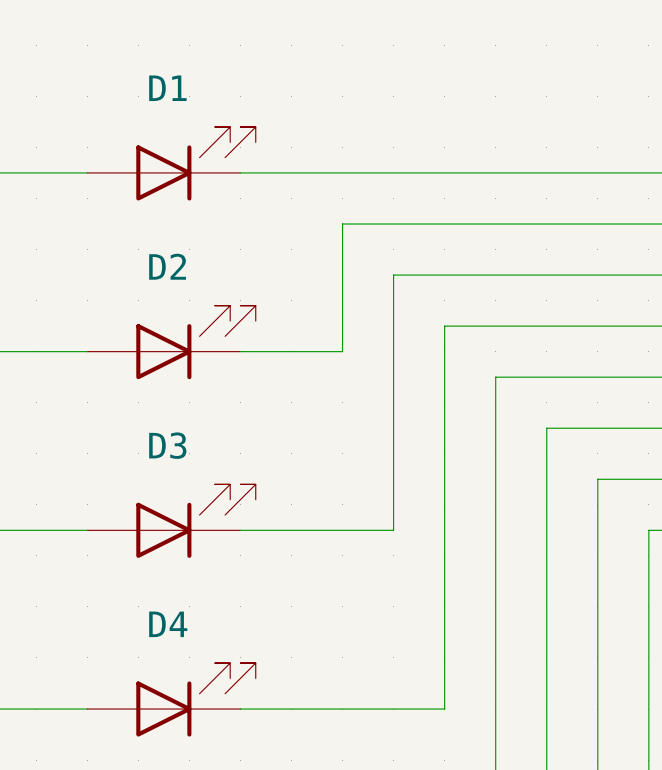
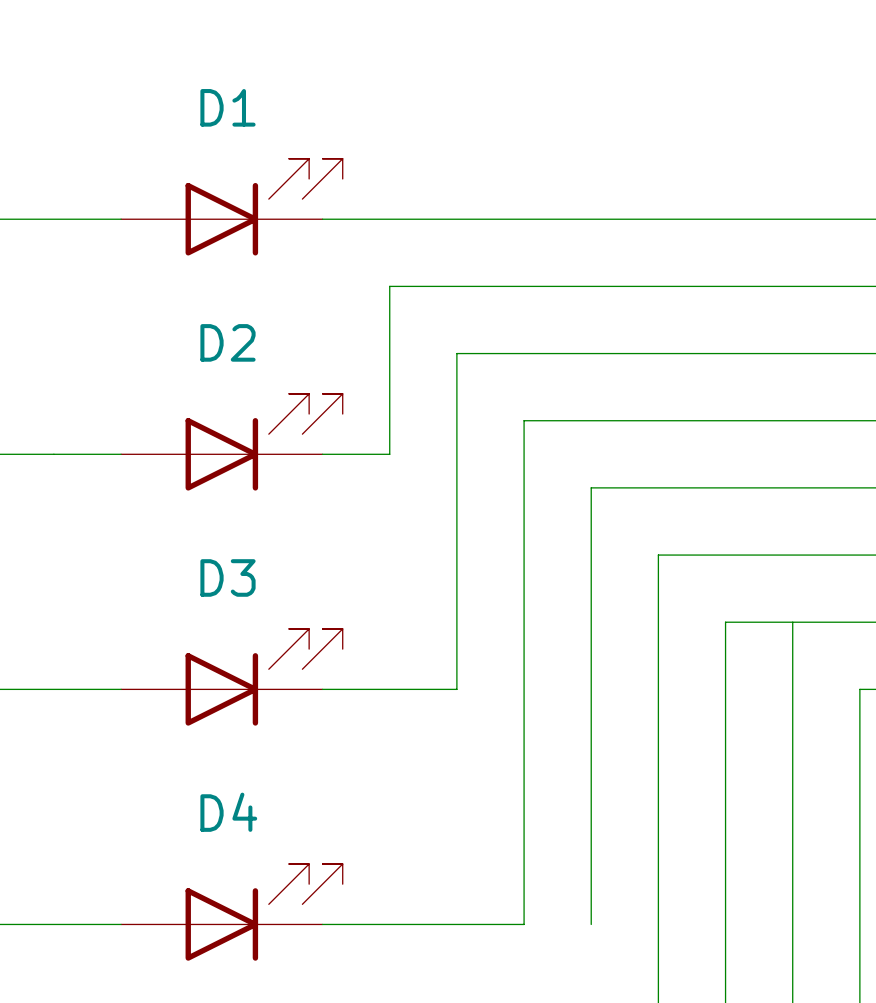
wire: (342, 224) (342, 275) -> (524, 353) (456, 353)
wire: (393, 275) (393, 326) -> none
wire: (444, 326) (444, 377) -> (591, 420) (524, 420)
wire: (291, 351) (342, 351) -> (389, 454) (389, 286) (456, 286)
wire: (495, 377) (495, 428) -> (658, 487) (591, 487)
wire: (546, 428) (546, 479) -> (725, 555) (658, 555)
wire: none -> (725, 622) (792, 622)
wire: (342, 530) (393, 530) -> (456, 689) (456, 454)
wire: (393, 709) (444, 709) -> (524, 924) (524, 689)

